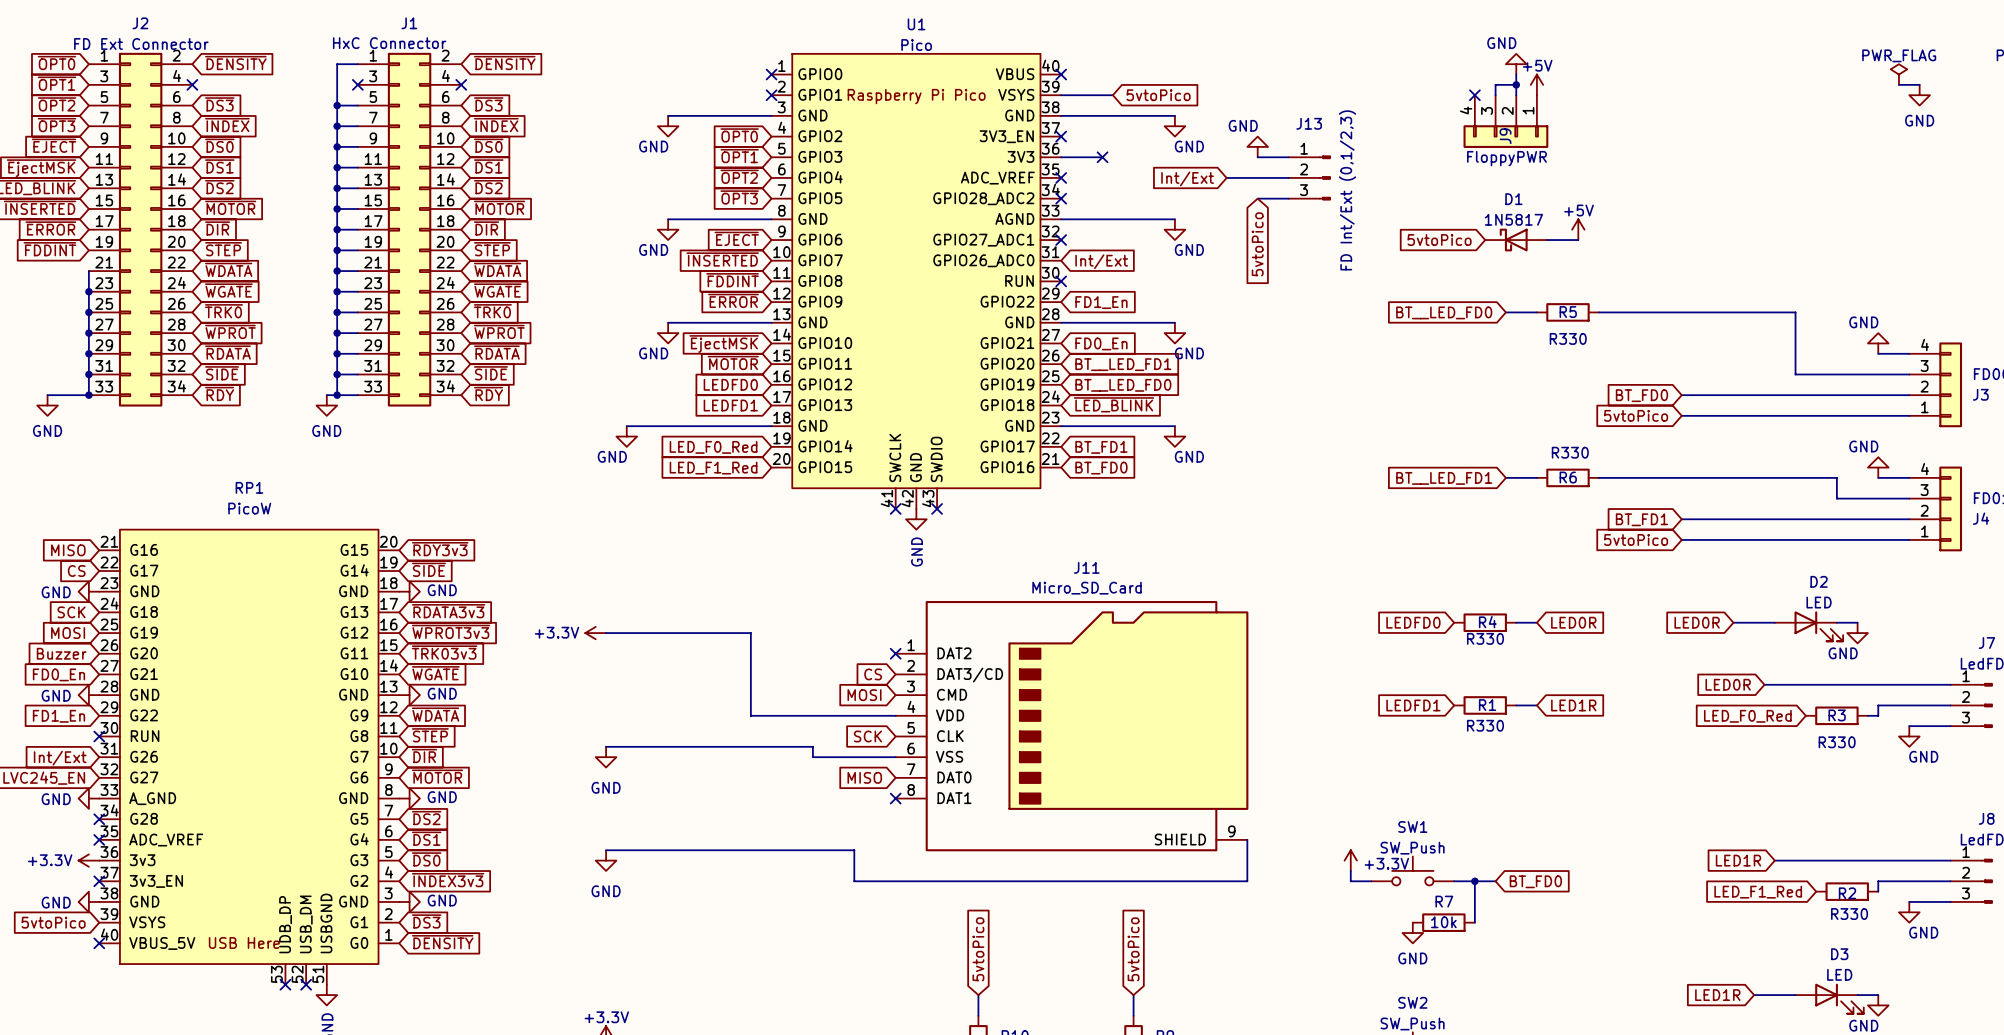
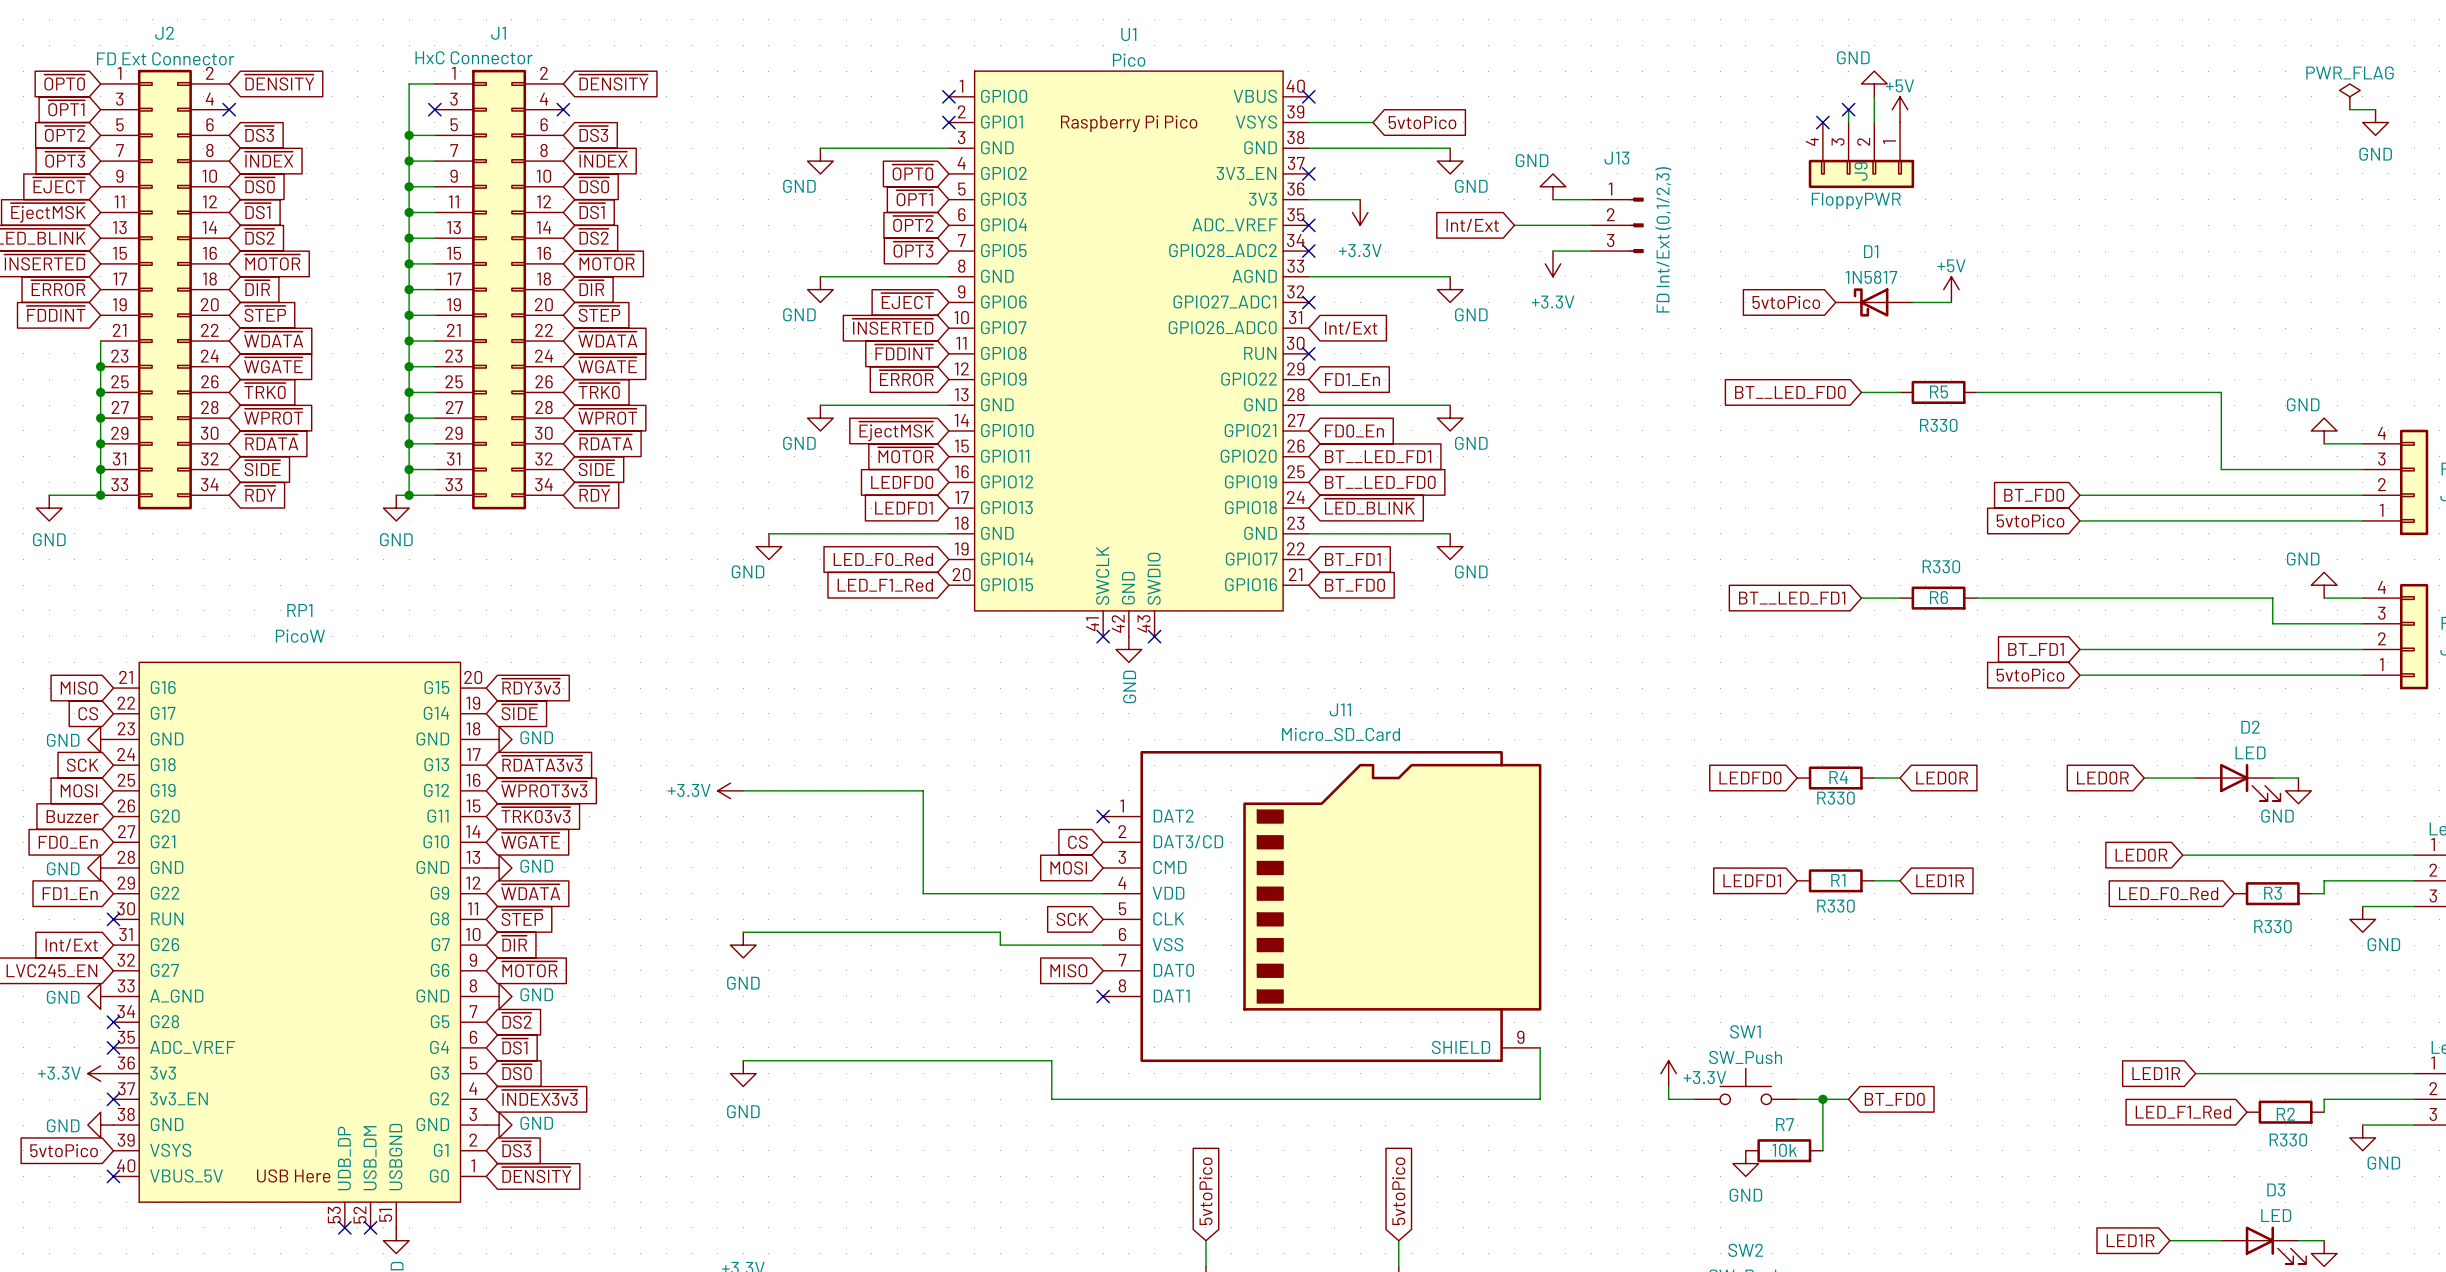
wire: (1495, 84) (1516, 84) -> none
no-connect mark: none -> (1848, 109)
junction: (1516, 84) -> none
no-connect mark: (1102, 157) -> none
power symbol: none -> +3.3V (1360, 212)
power symbol: none -> +3.3V (1552, 263)
global label: 5vtoPico (1257, 244) -> none

